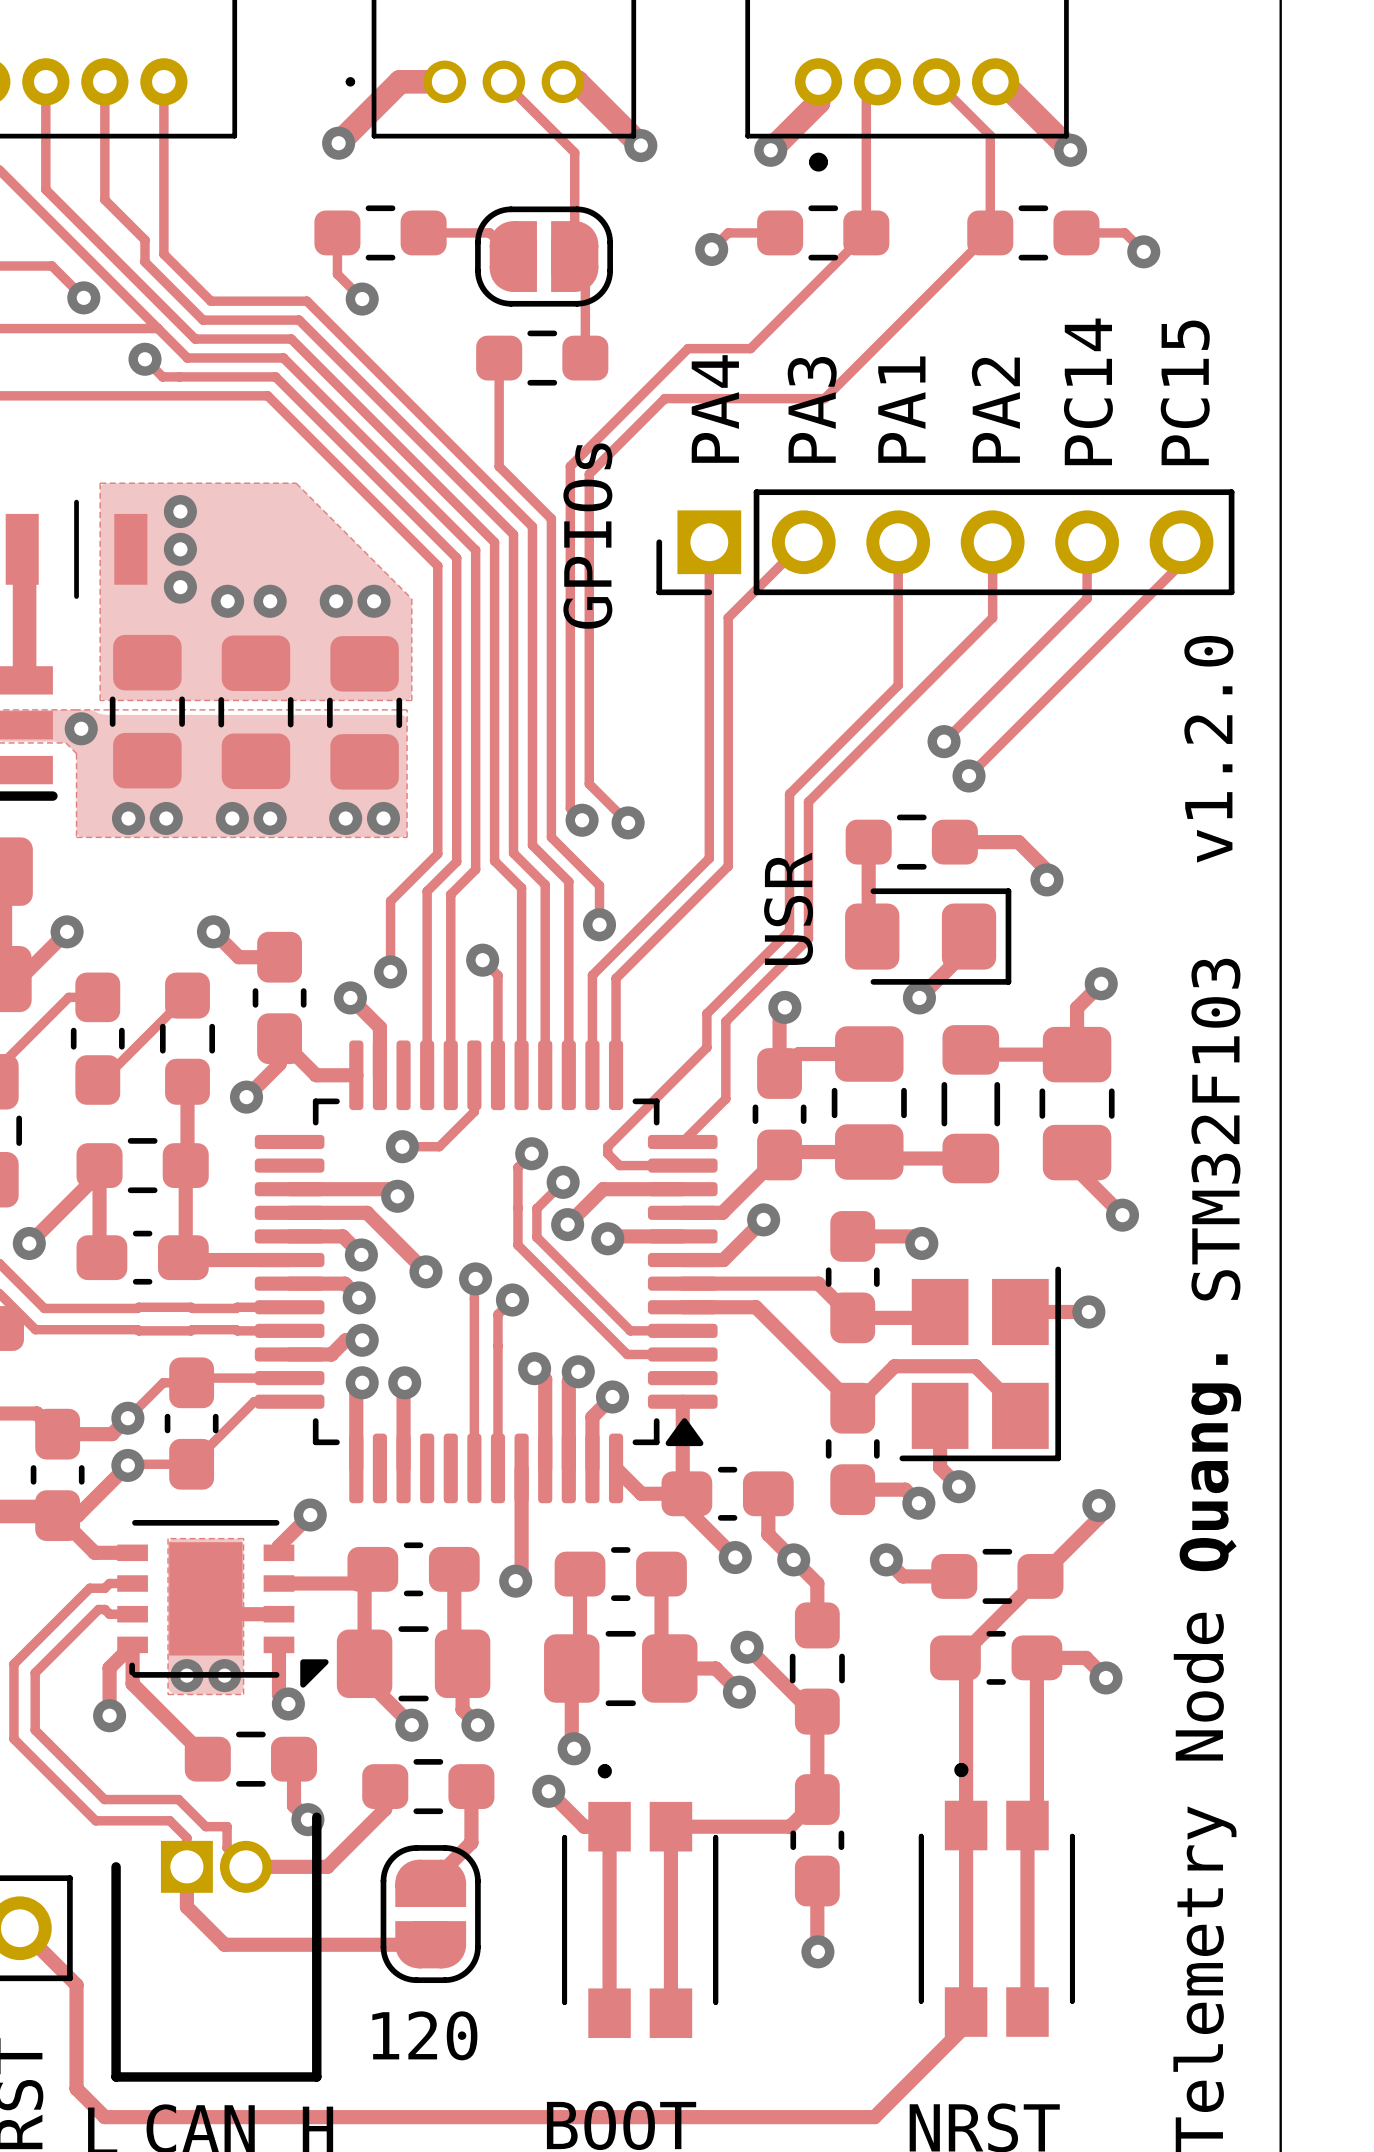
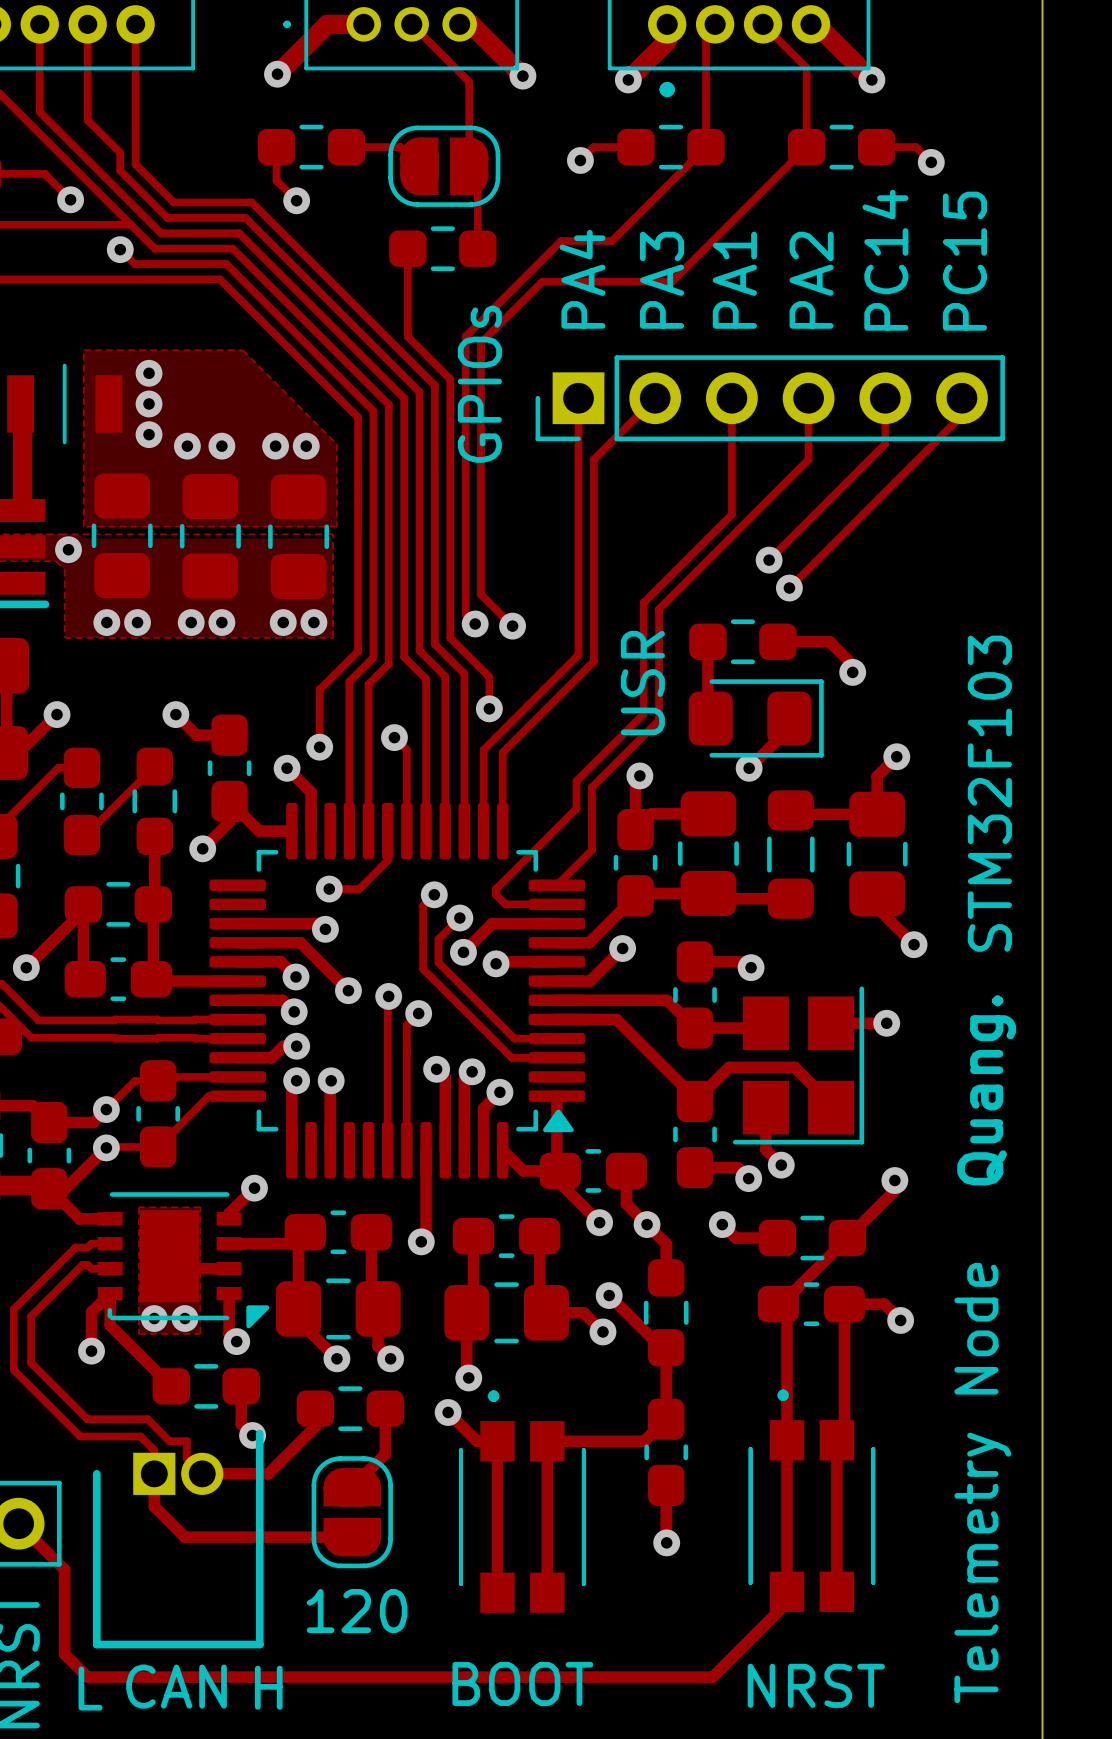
text: v1.2.0 (1208, 749) -> none
text position: STM32F103 (1215, 1129) -> STM32F103 (989, 793)
text position: Quang. (1210, 1462) -> Quang. (986, 1090)

